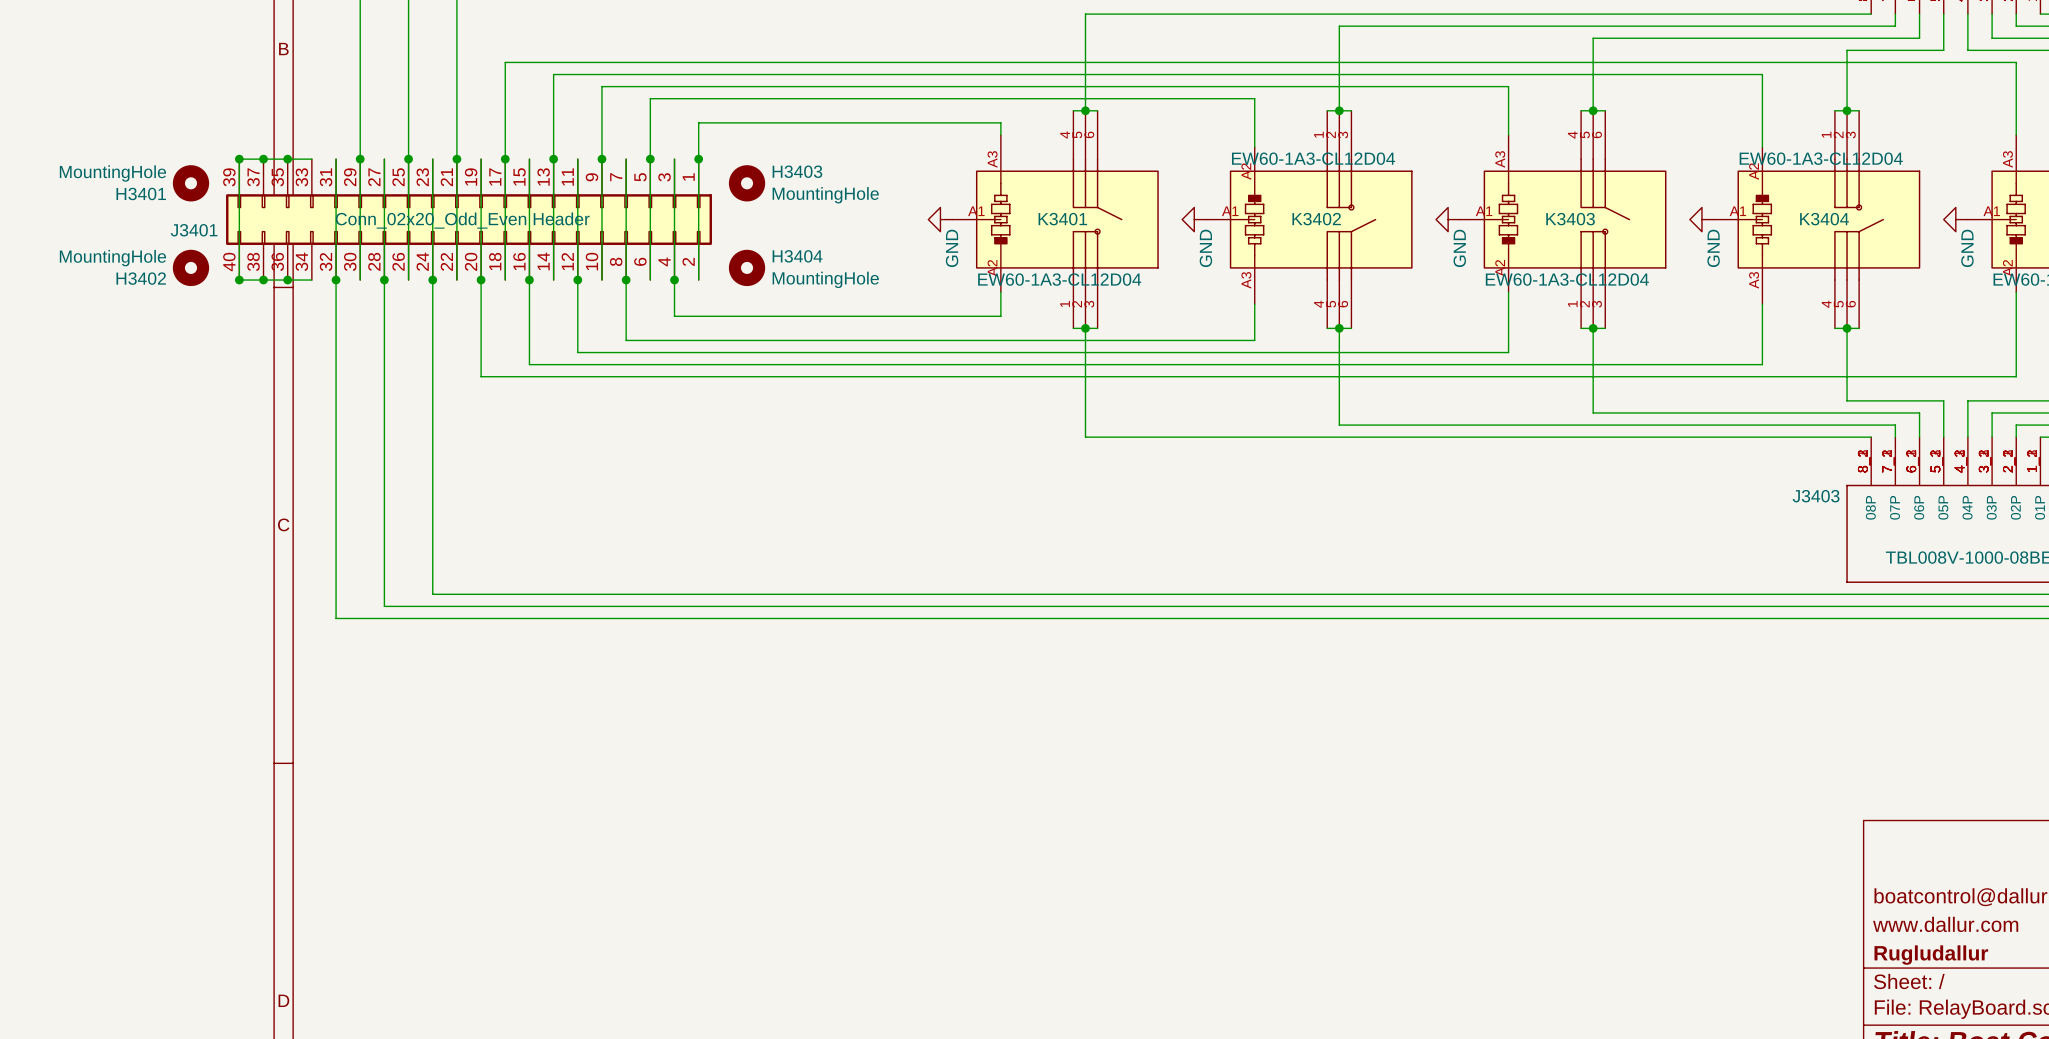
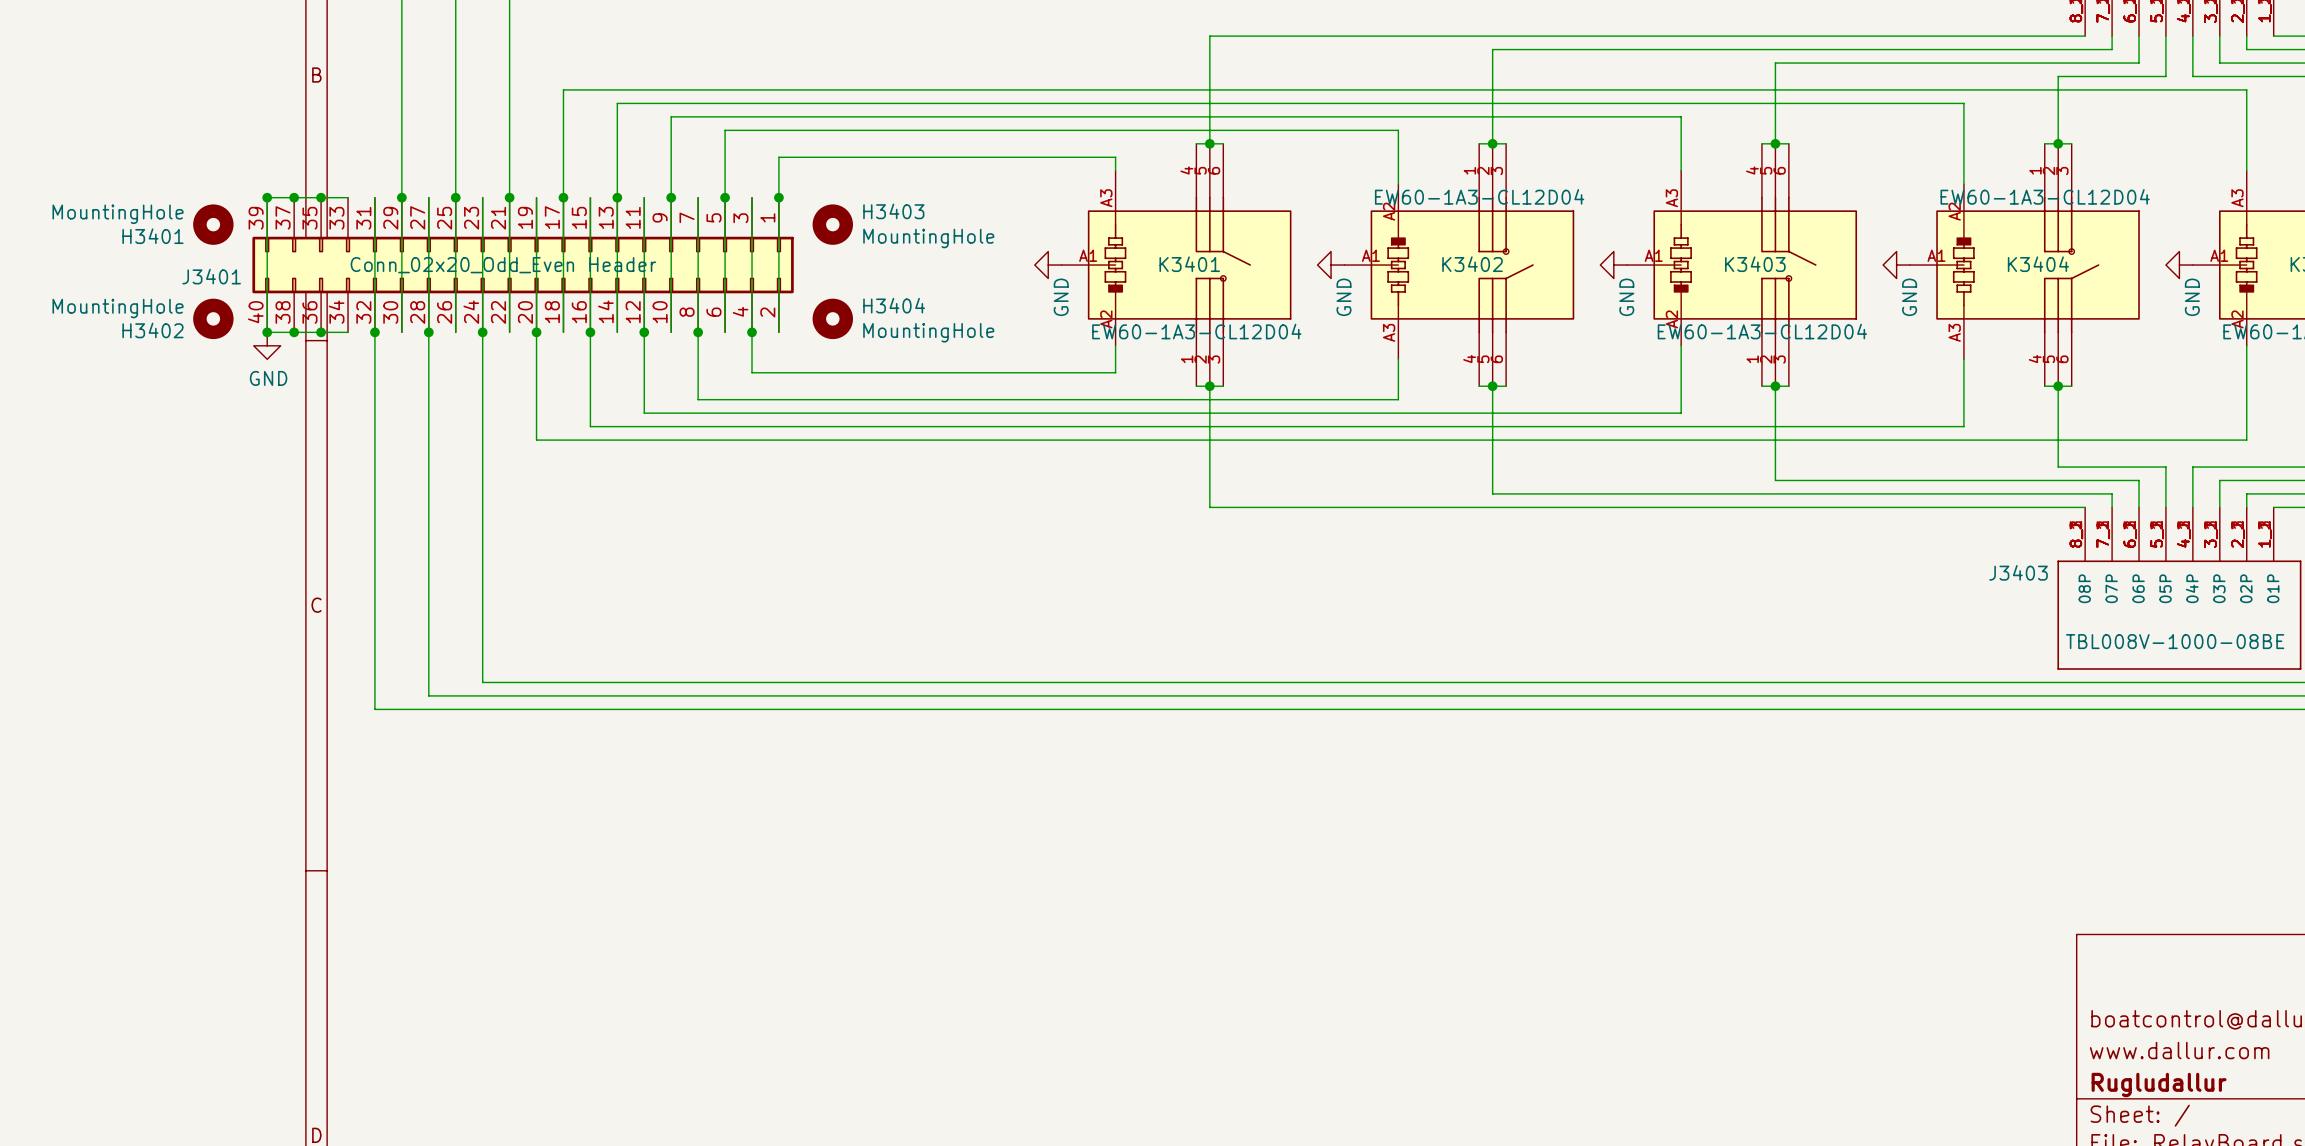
power symbol: none -> GND (267, 345)

